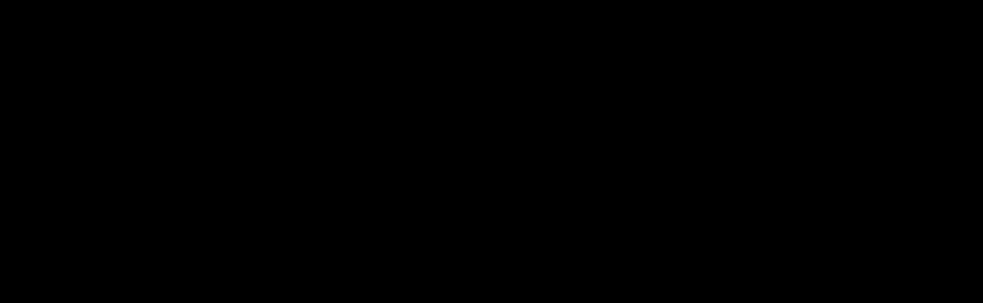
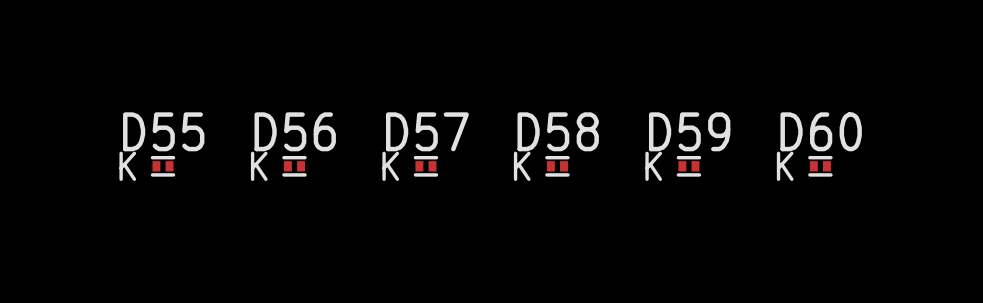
D55: none -> (162, 166)
D56: none -> (294, 166)
D57: none -> (425, 166)
D58: none -> (557, 166)
D59: none -> (688, 166)
D60: none -> (820, 166)

